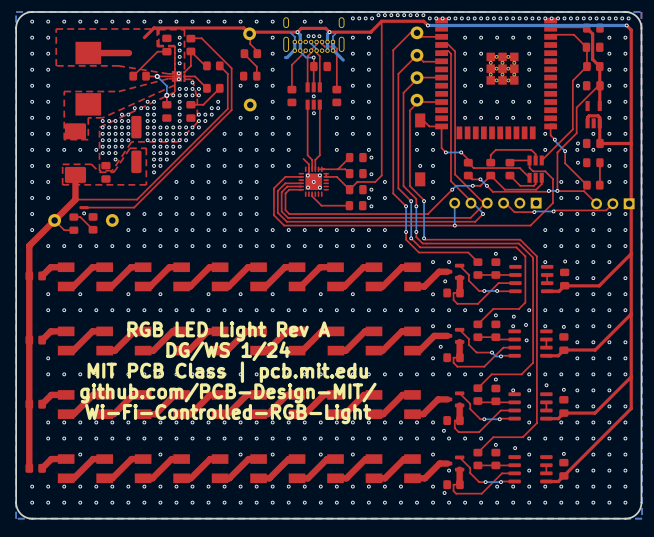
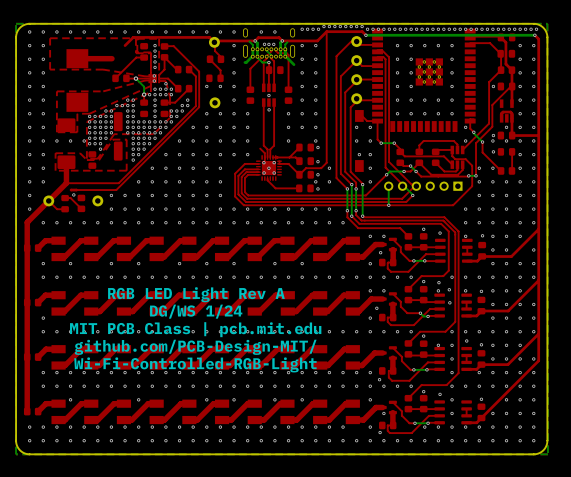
top track: (557, 190) (583, 191) (596, 203) -> none
via: none -> (506, 181)
via: none -> (520, 181)
via: none -> (533, 181)
top track: (503, 201) (514, 212) (534, 212) -> none
top track: (612, 203) (606, 210) (553, 211) -> none
part: (612, 203) -> none
bottom track: (553, 211) (534, 212) -> none
via: (553, 211) -> none
via: (534, 212) -> none

